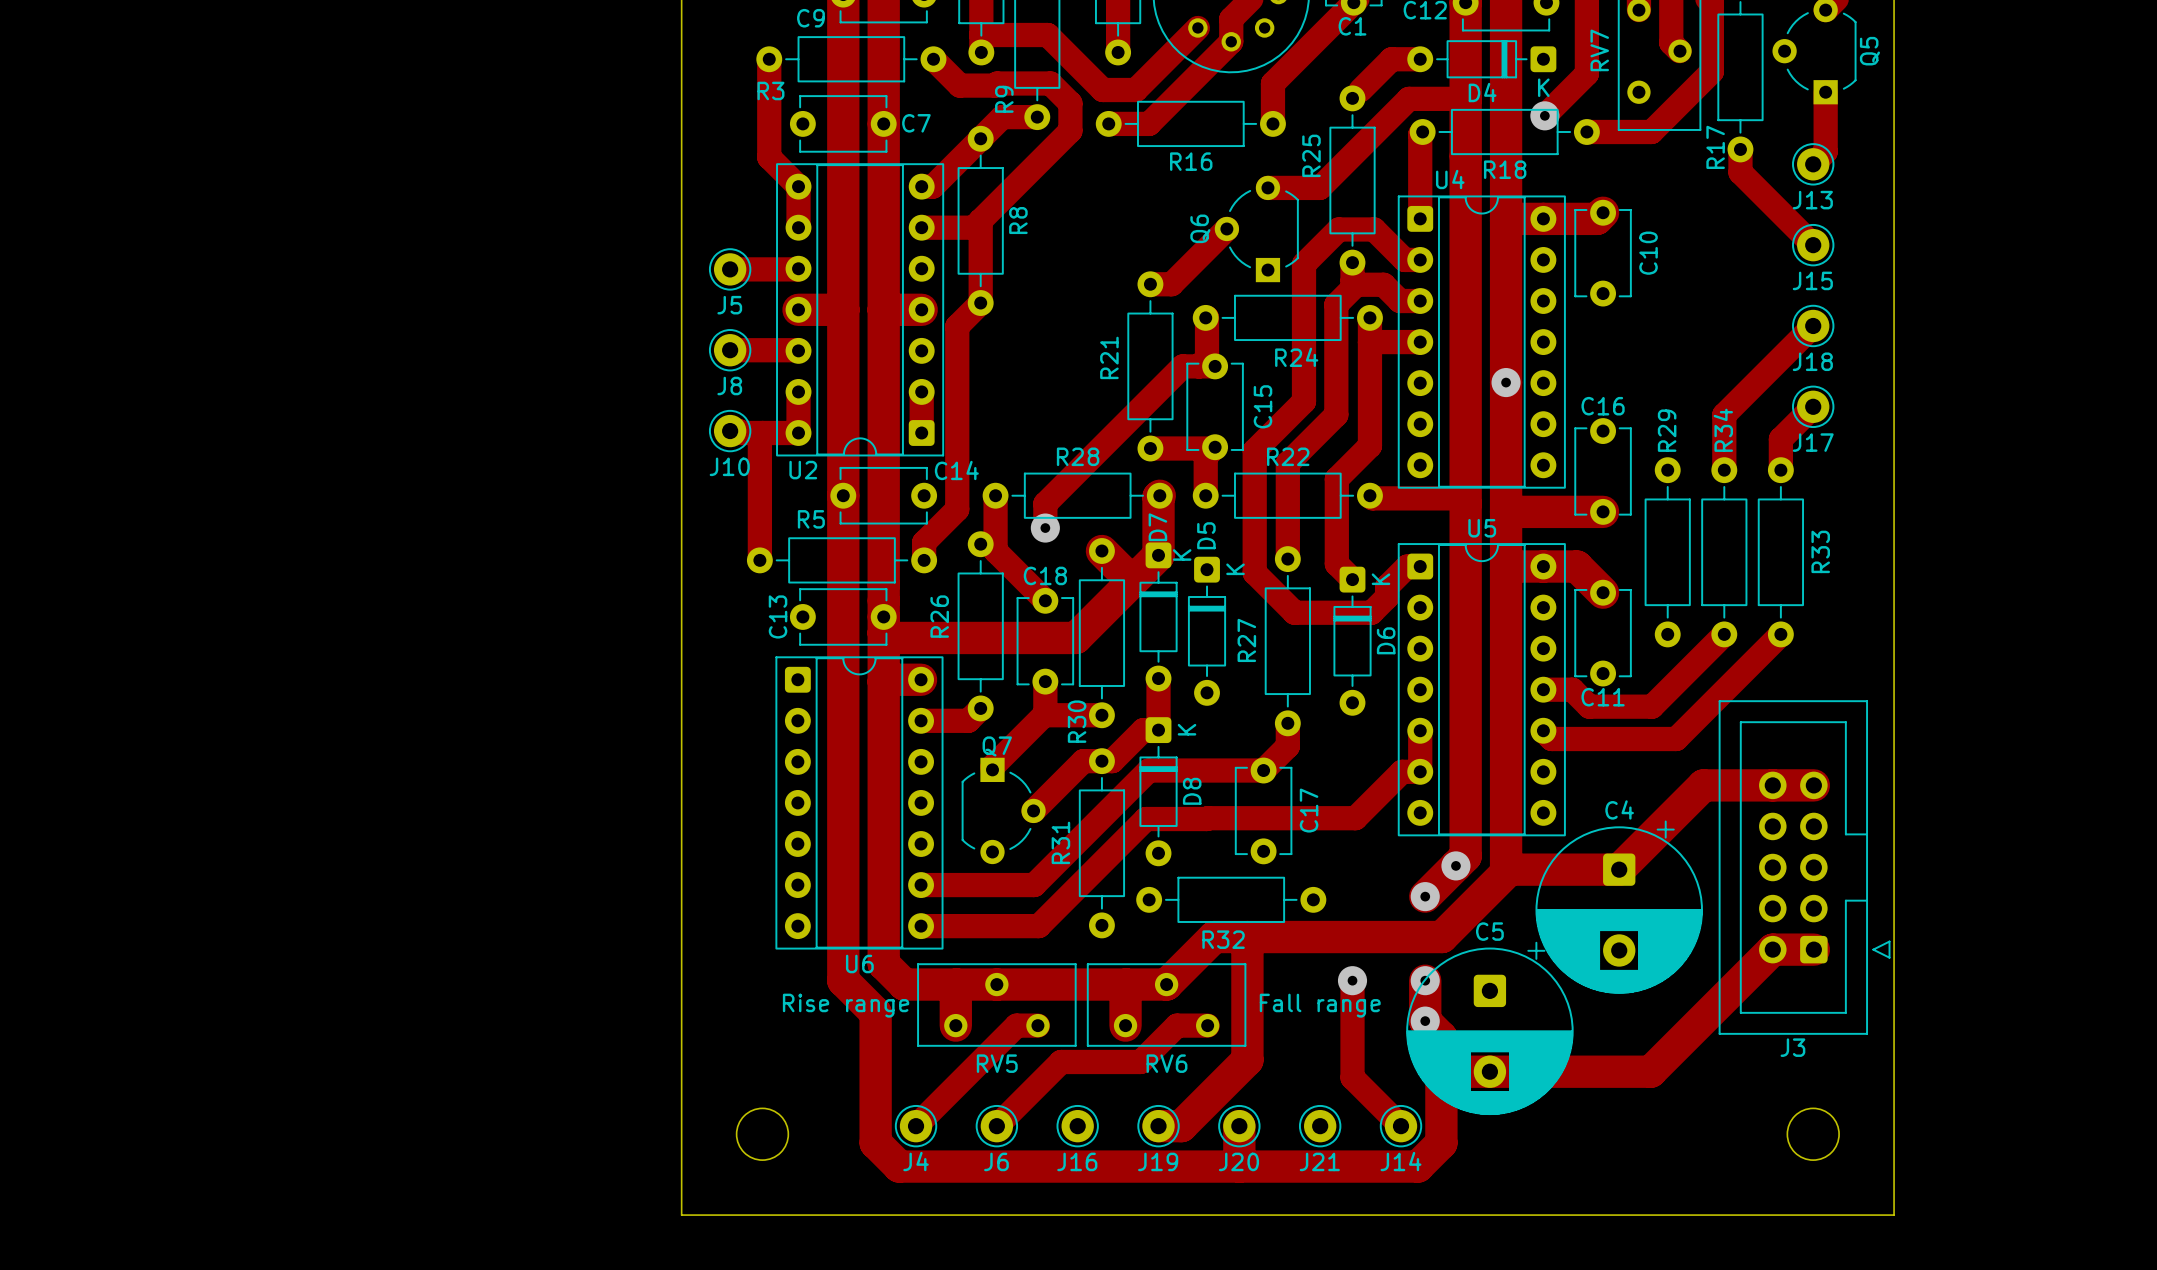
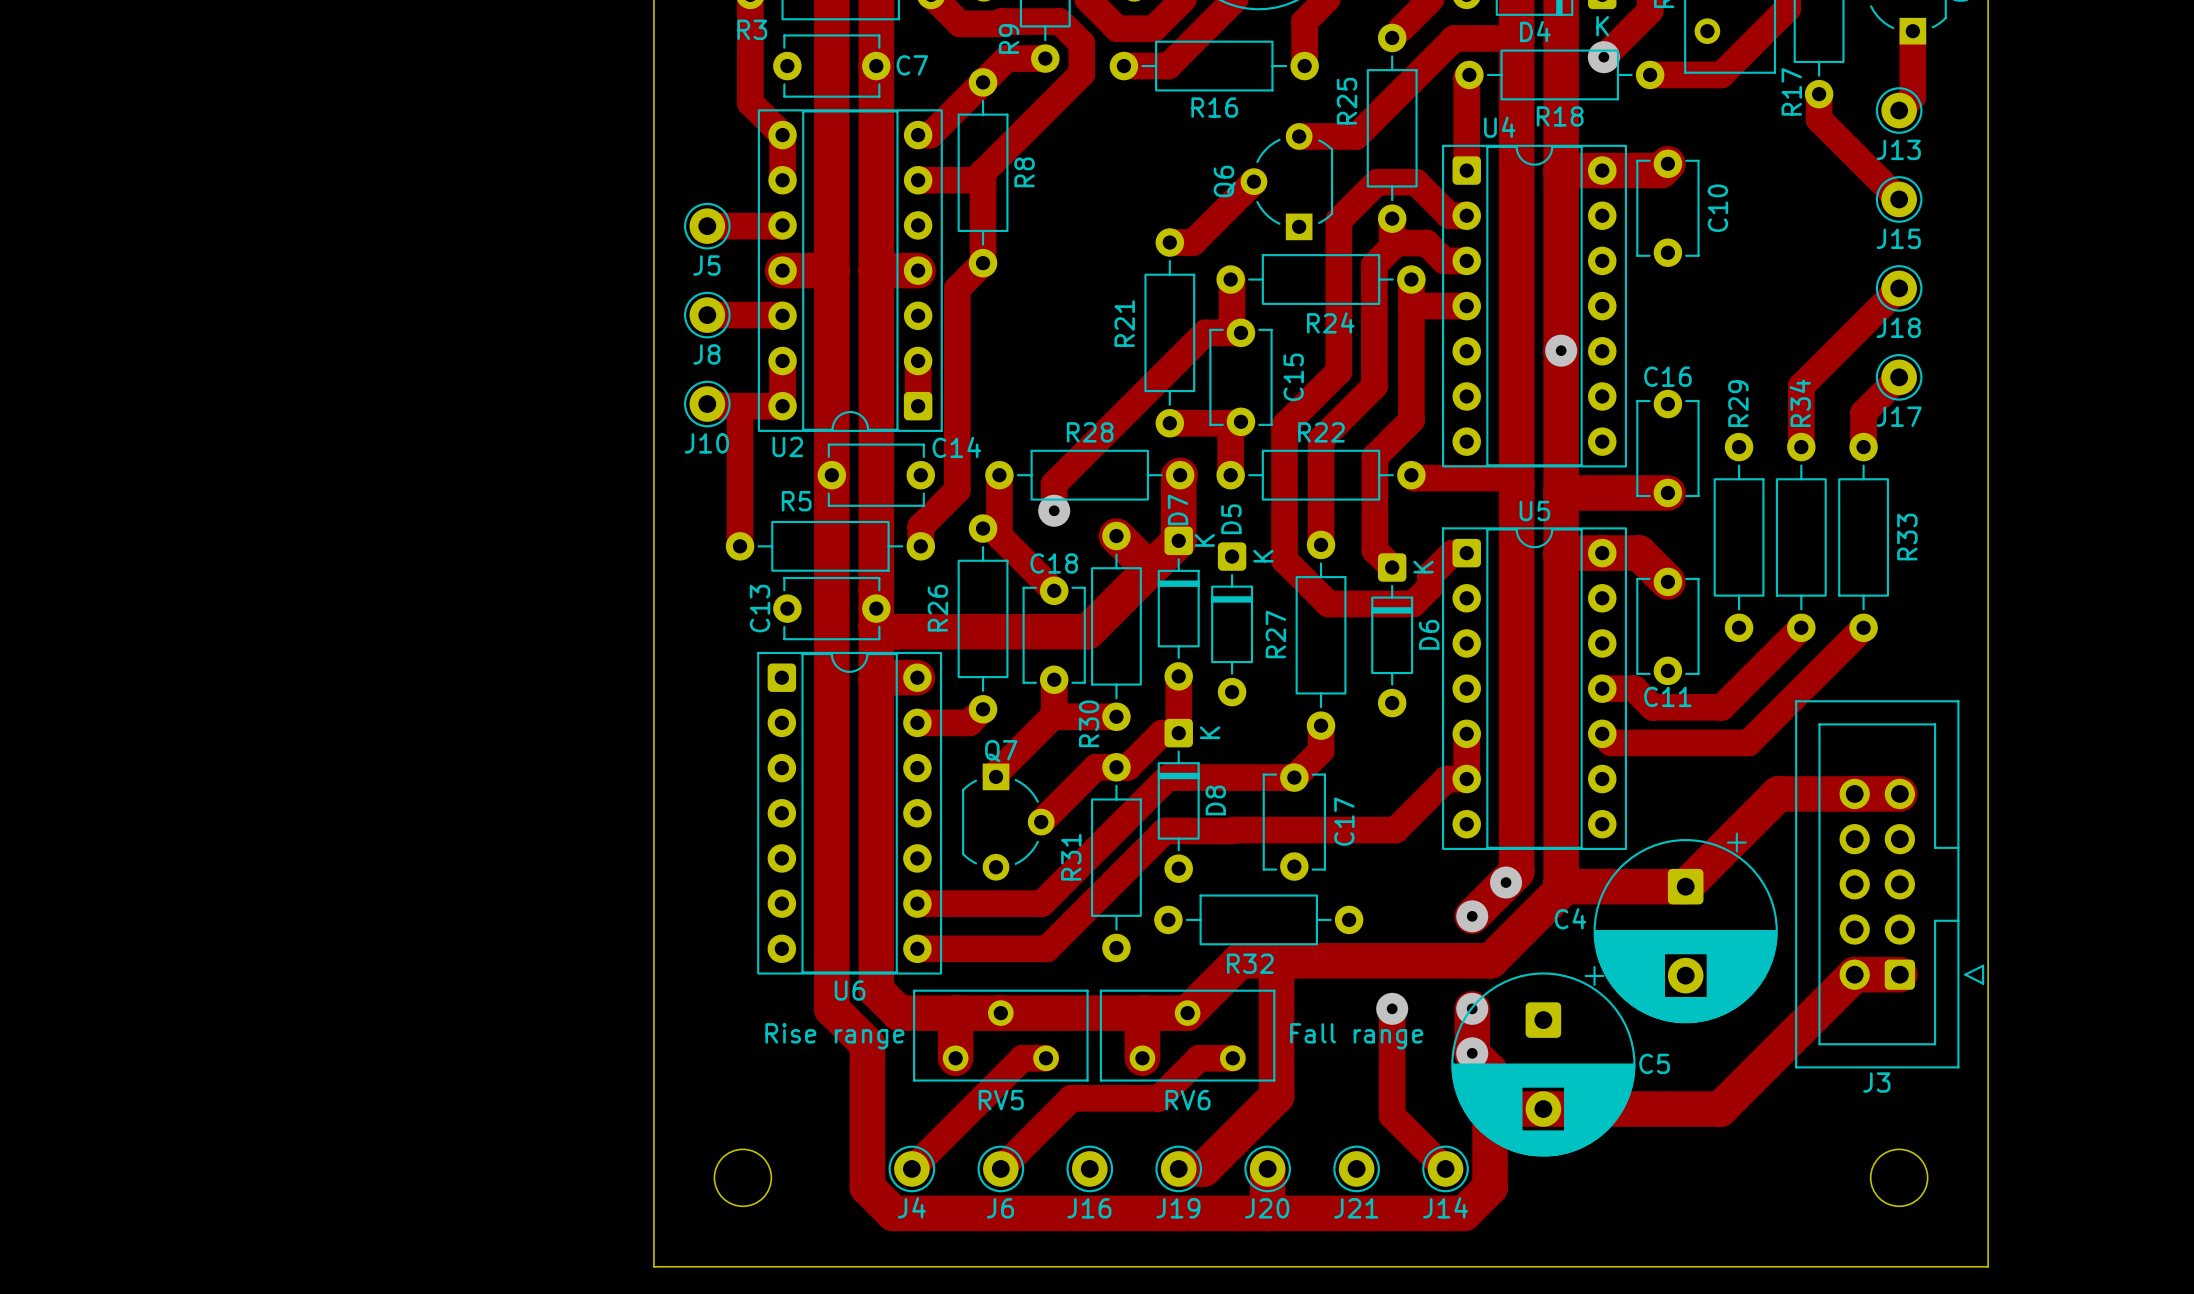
C4 name position: C4 (1619, 809) -> C4 (1570, 918)
C5 name position: C5 (1489, 931) -> C5 (1654, 1063)

